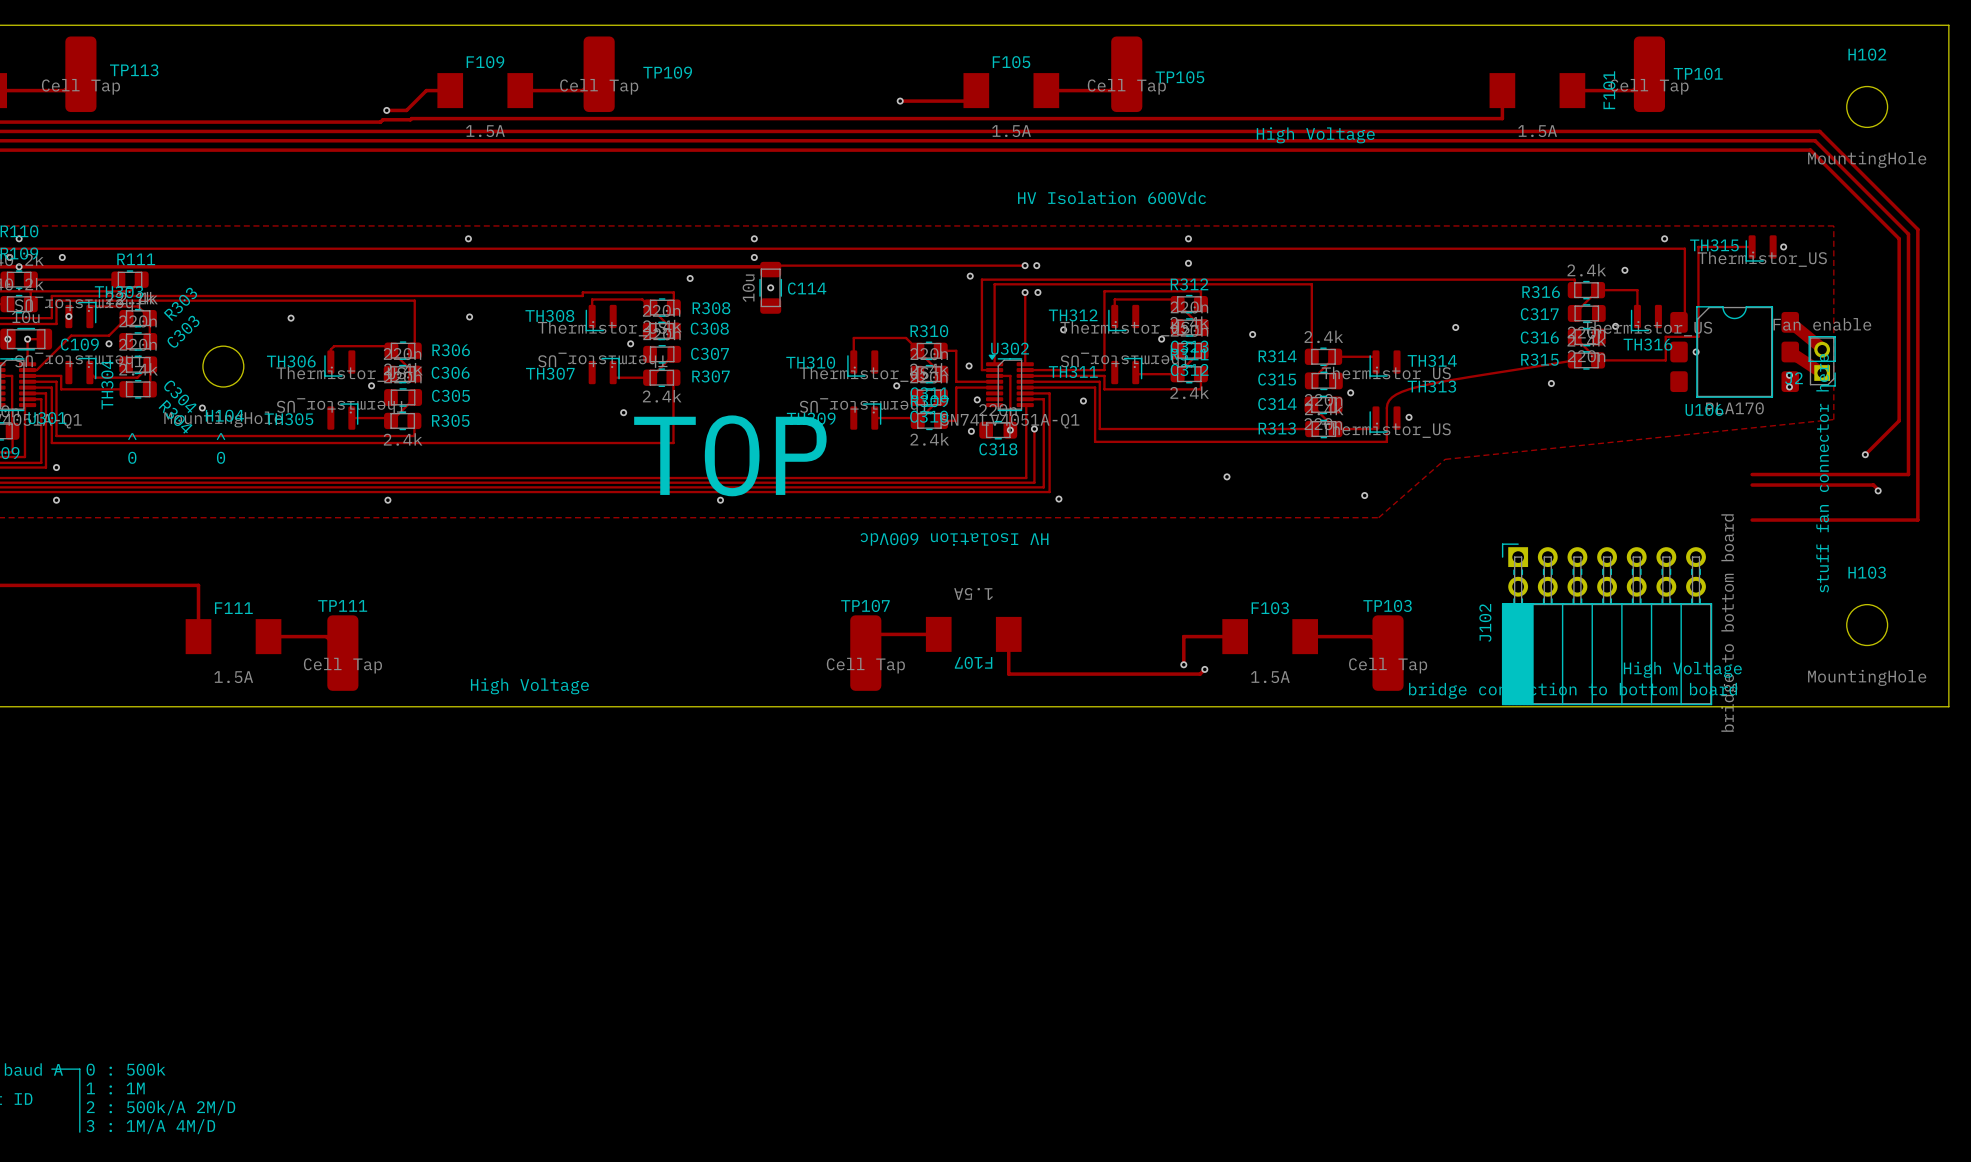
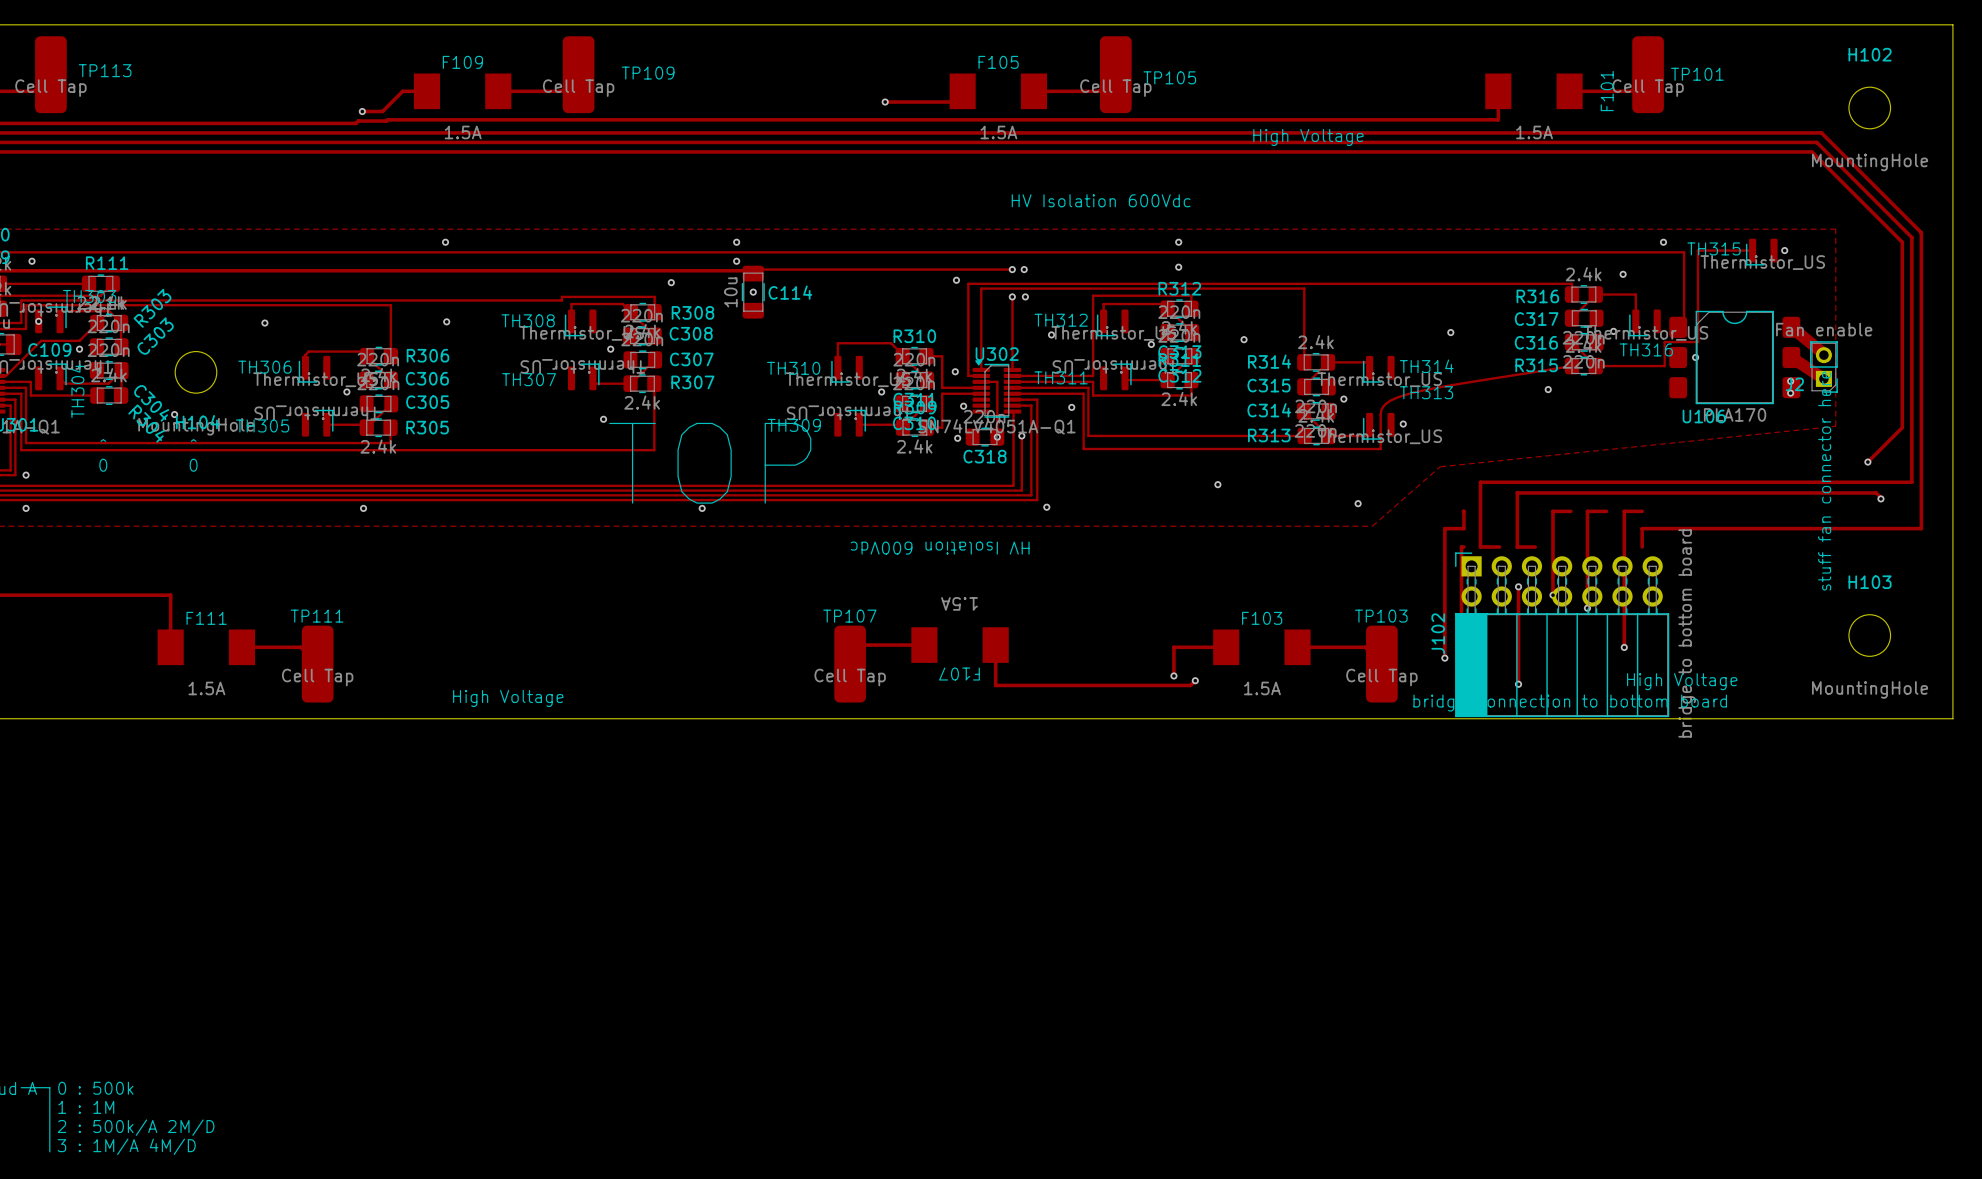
track: none -> (1752, 482) (1480, 482) (1480, 547) (1499, 547)
track: none -> (1752, 492) (1517, 492) (1517, 547) (1535, 547)
track: none -> (1463, 511) (1463, 528) (1444, 528) (1444, 658)
track: none -> (1570, 511) (1552, 511) (1552, 595)
track: none -> (1606, 511) (1587, 511) (1587, 608)
track: none -> (1642, 511) (1624, 511) (1624, 647)
track: none -> (1752, 528) (1642, 528) (1642, 547)
track: none -> (1463, 547) (1461, 547) (1461, 636)
track: none -> (1518, 586) (1518, 684)
via: none -> (1518, 586)
via: none -> (1552, 595)
via: none -> (1587, 608)
J102 position: (1607, 624) -> (1562, 634)
via: none -> (1624, 647)
via: none -> (1444, 658)
via: none -> (1518, 684)

